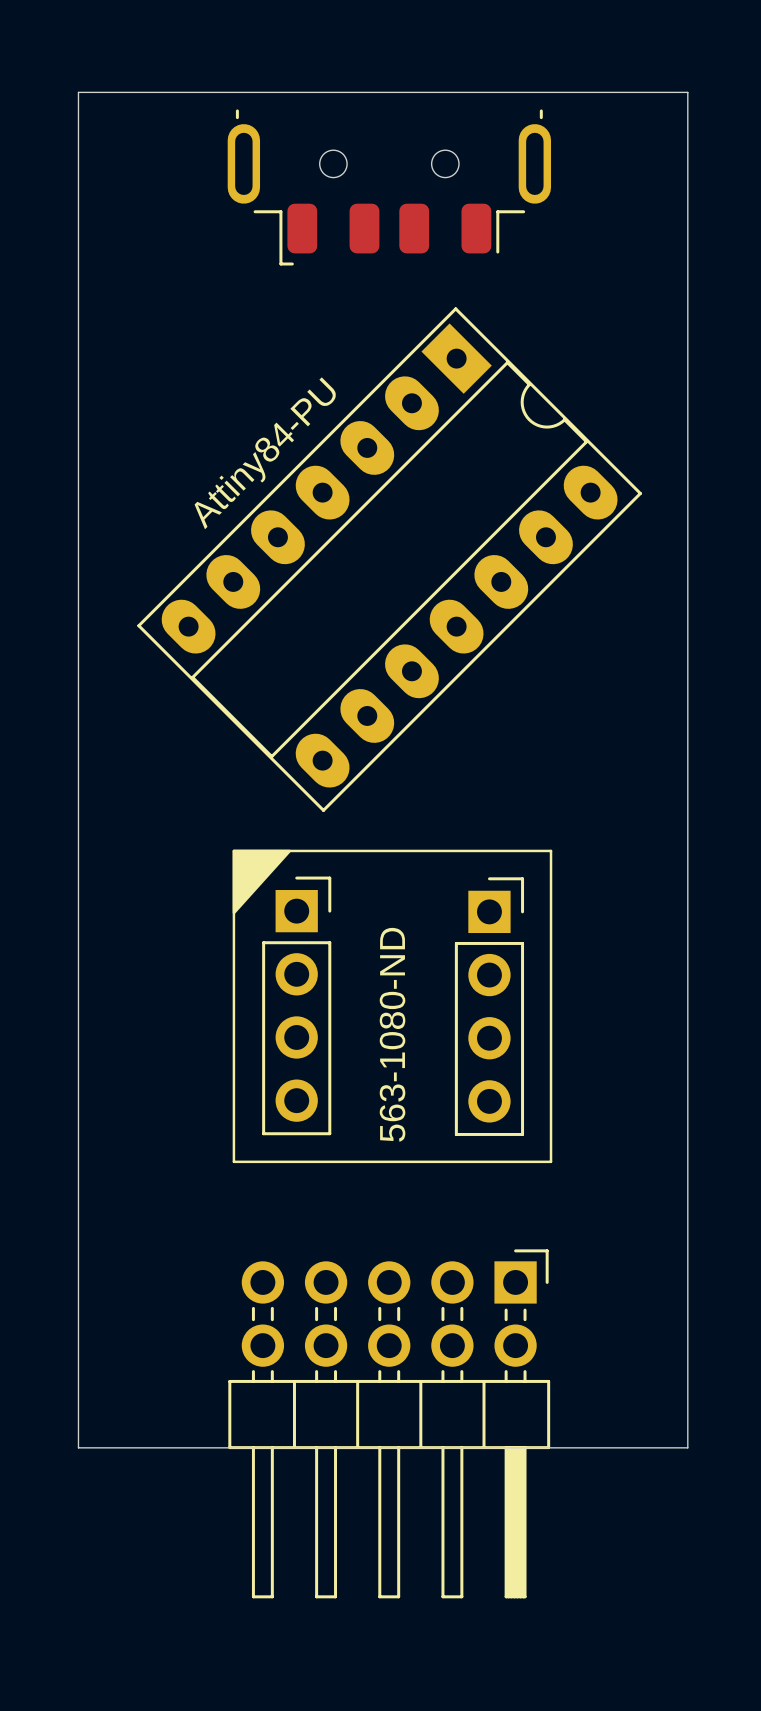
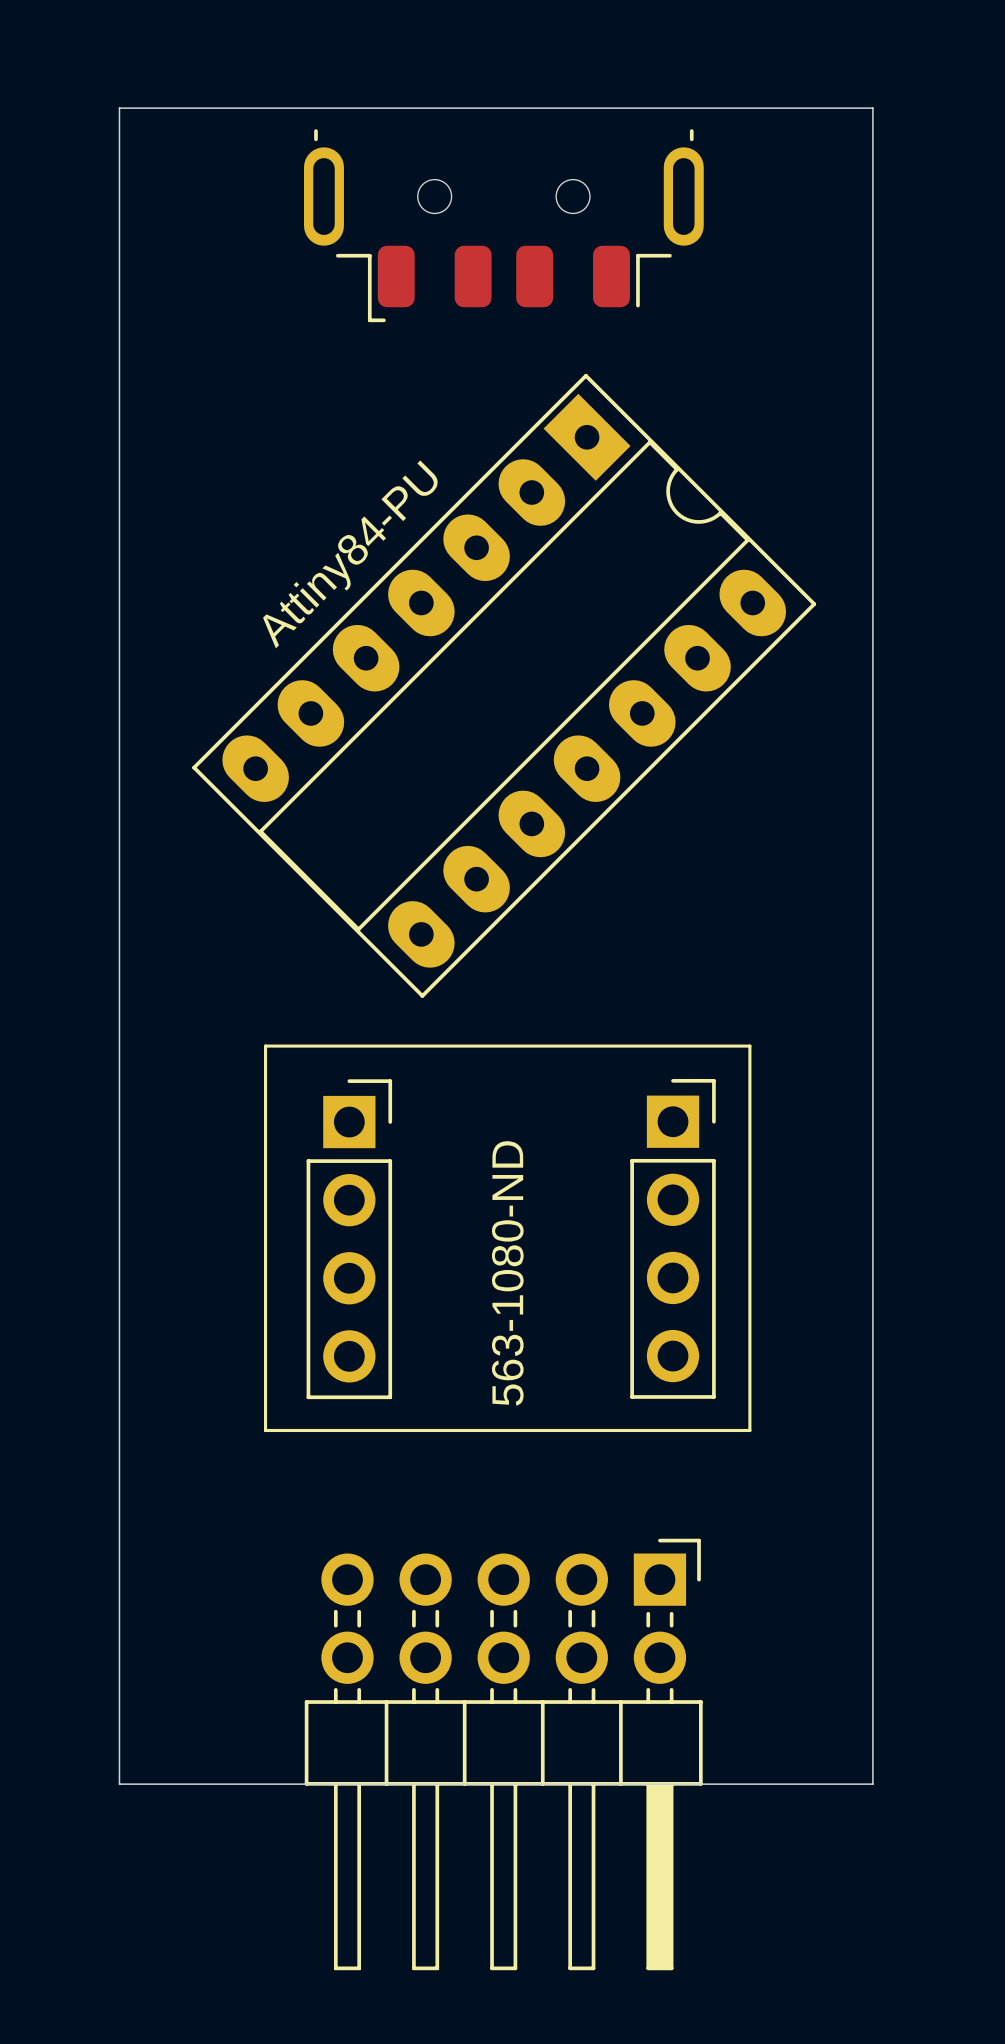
drawing: [232, 849, 292, 915] -> none
line: (233, 850) (233, 1161) -> (311, 1046) (265, 1046) (265, 1430) (311, 1430)
line: (551, 850) (551, 1161) -> (703, 1046) (749, 1046) (749, 1430) (703, 1430)
part position: (296, 1005) -> (349, 1239)
part position: (489, 1006) -> (673, 1238)

